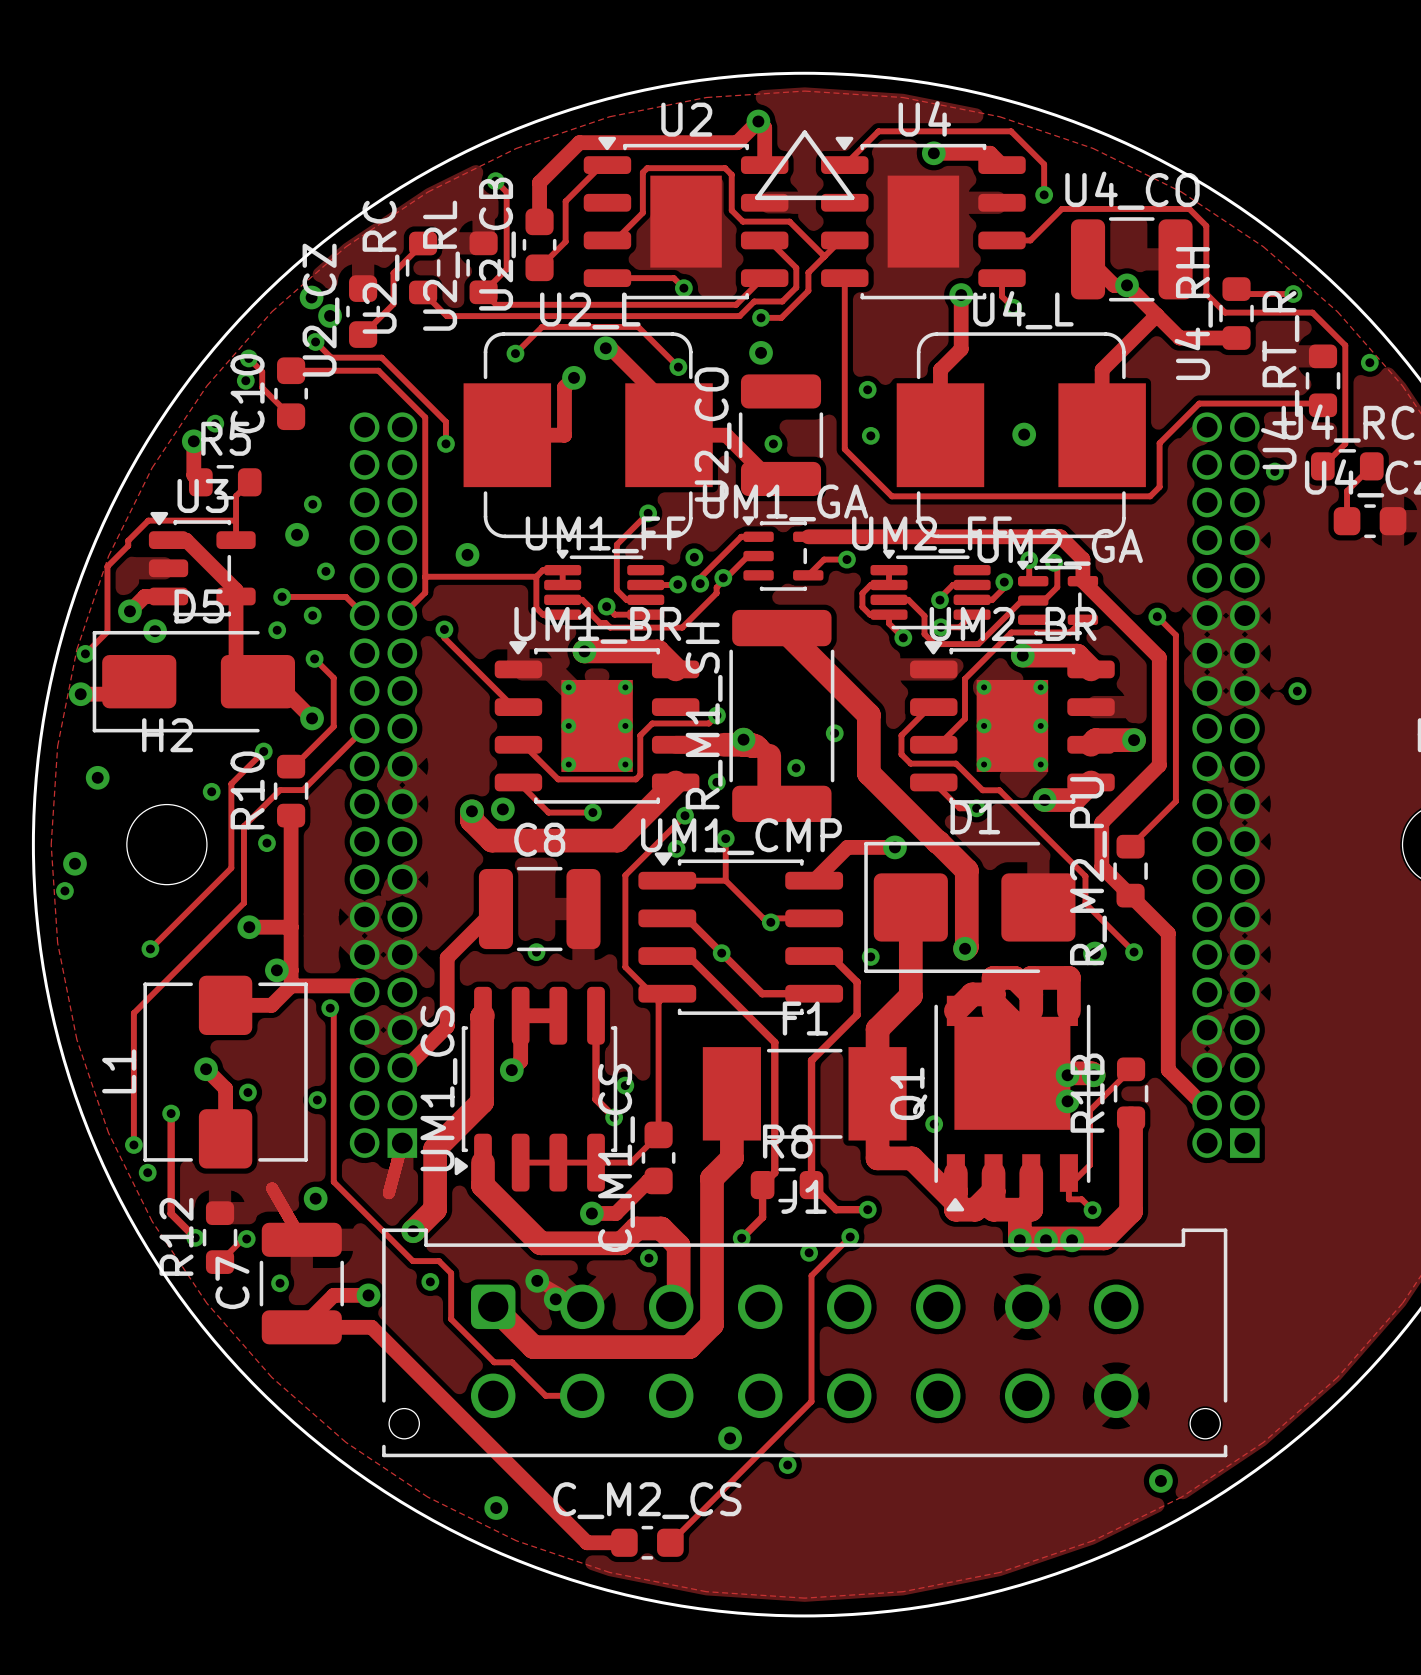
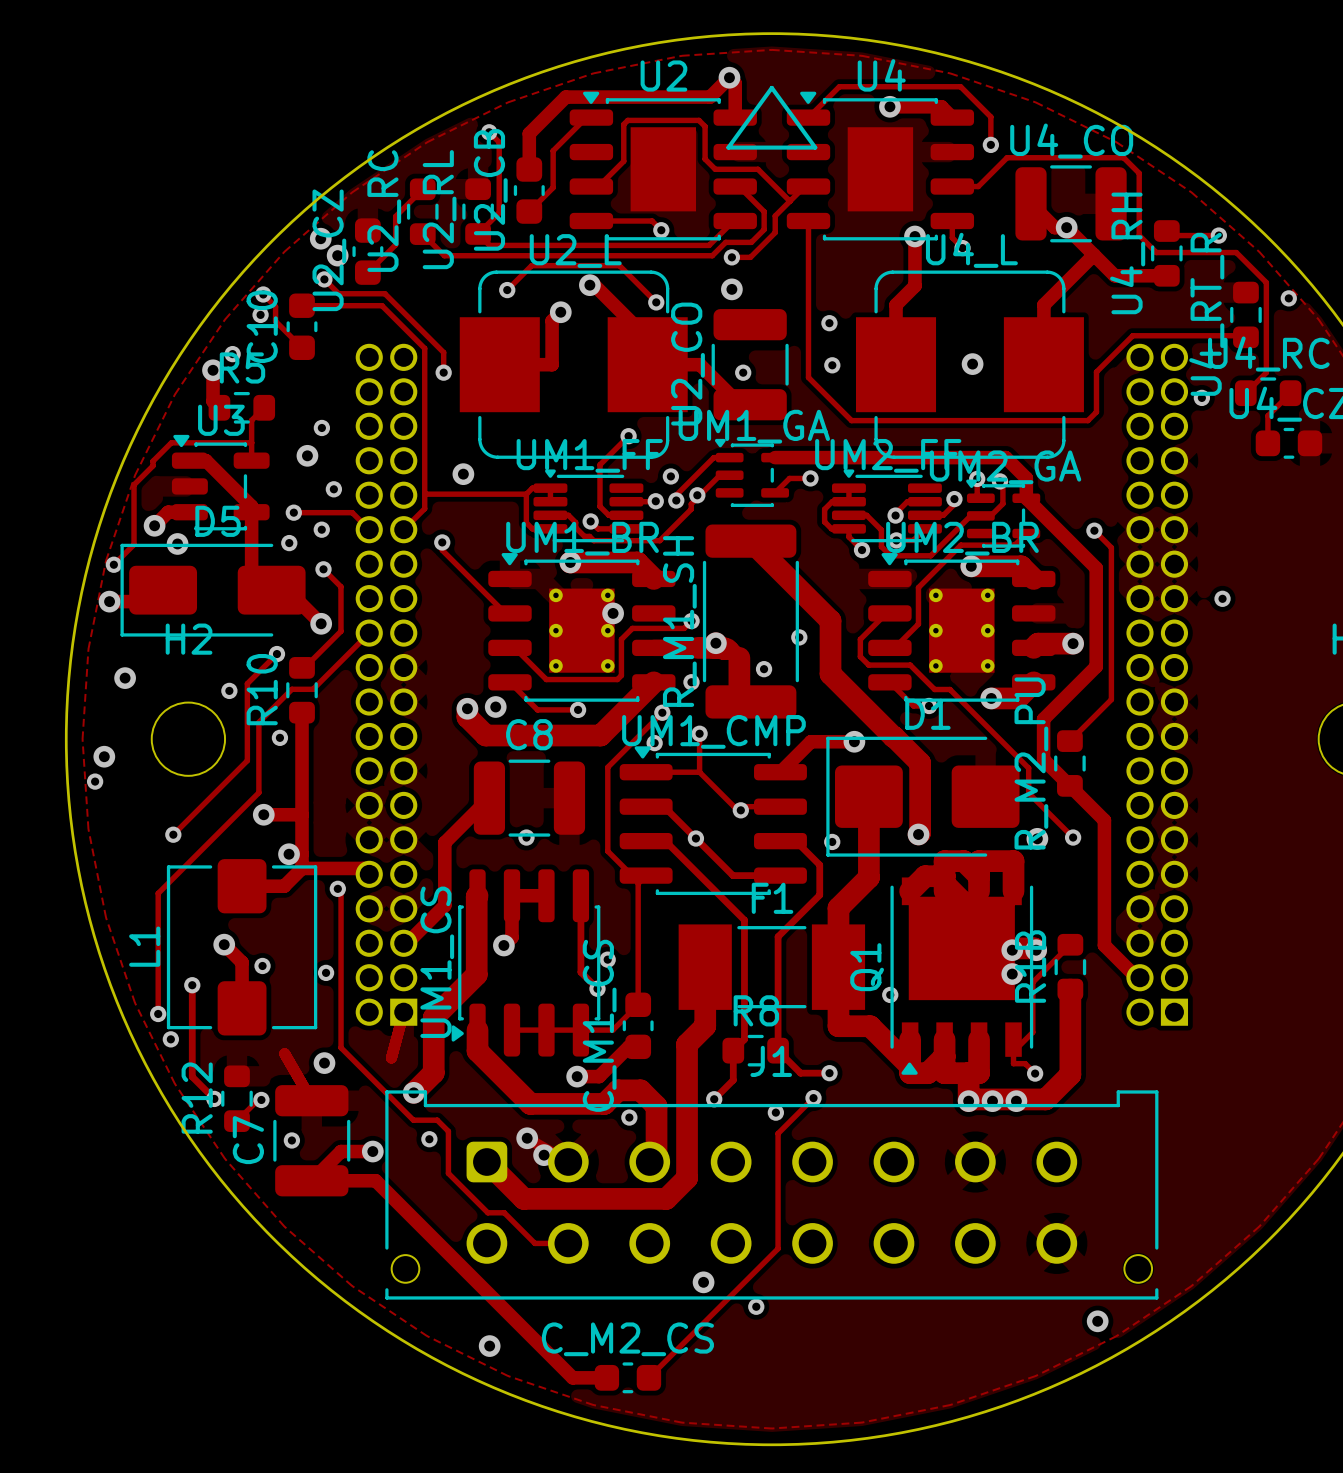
via: none -> (613, 613)

